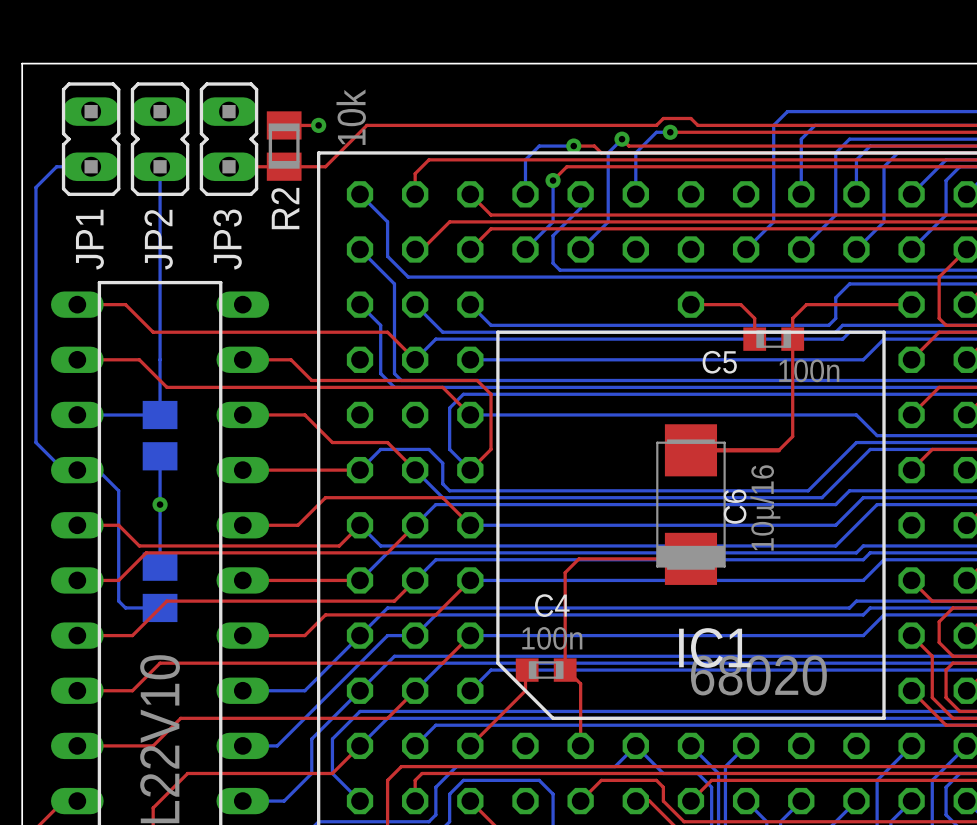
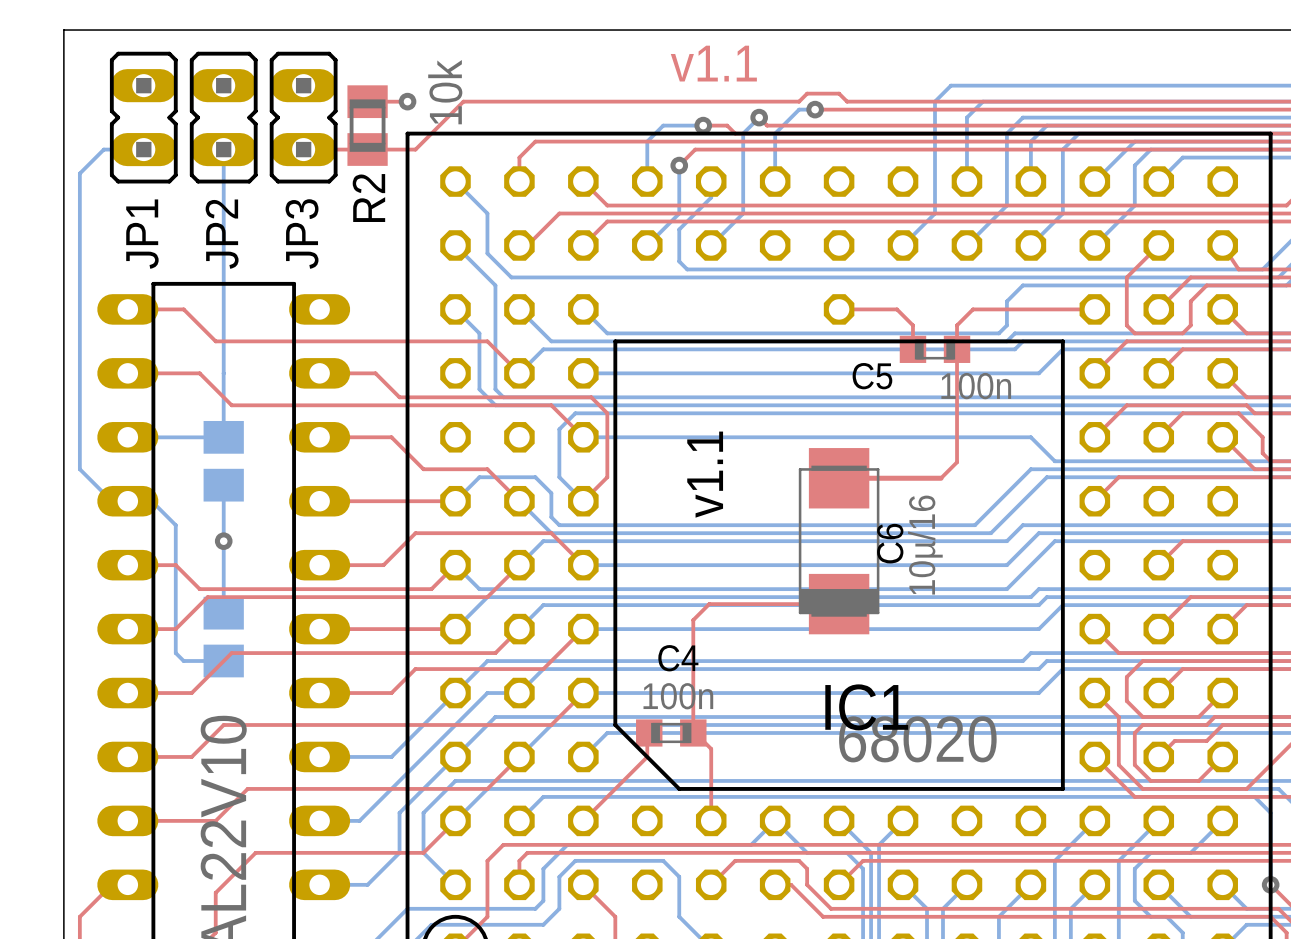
text: none -> v1.1 (713, 63)
text: none -> v1.1 (705, 474)

